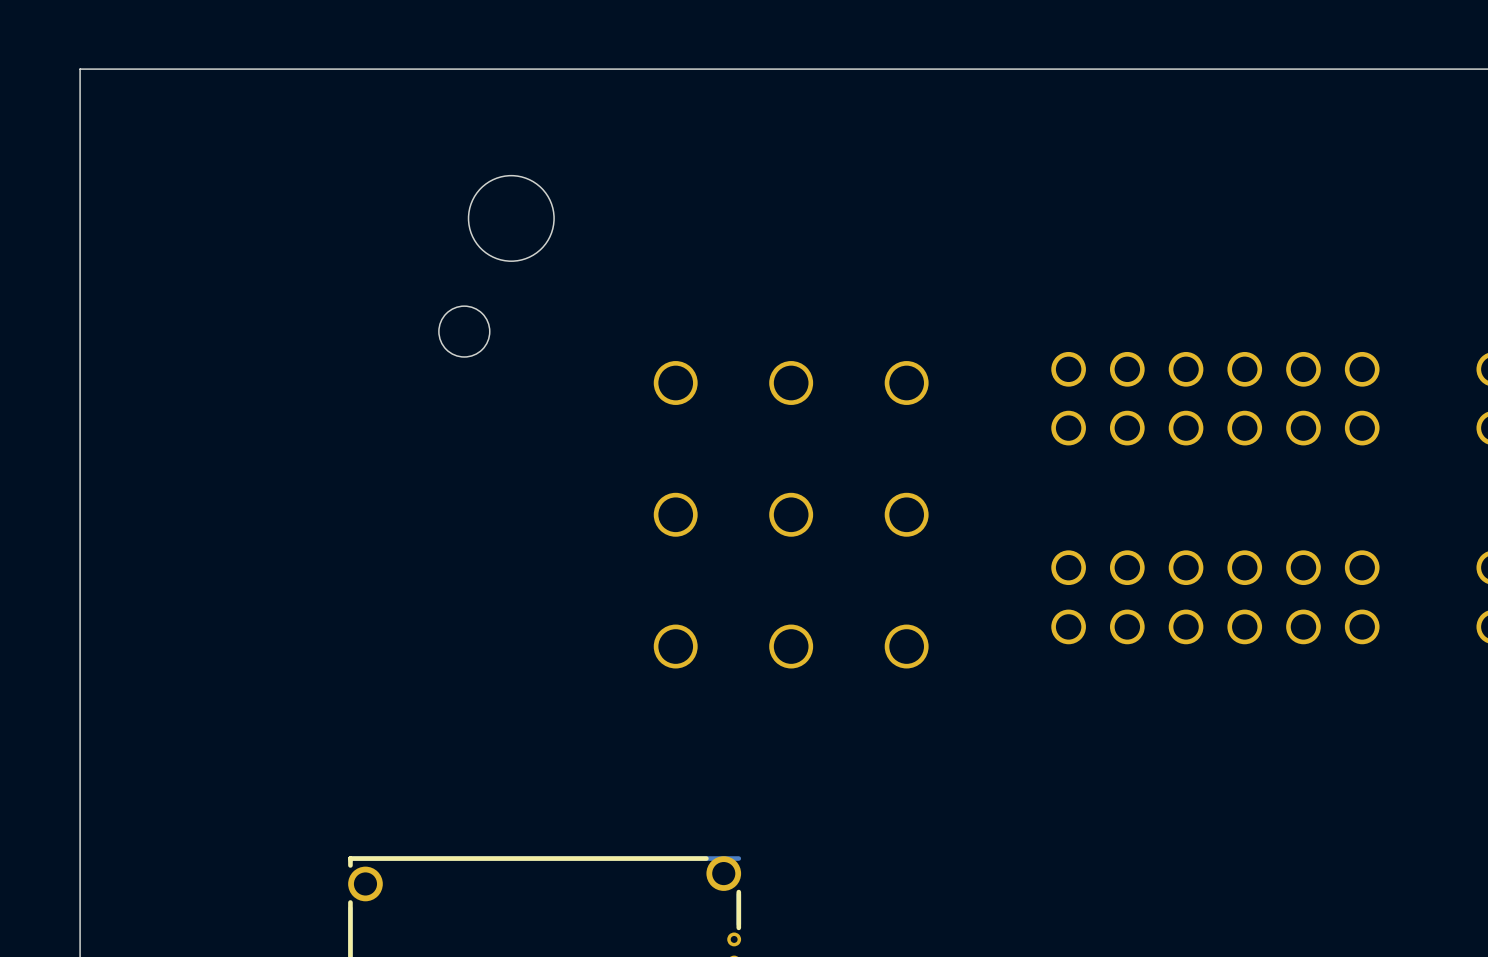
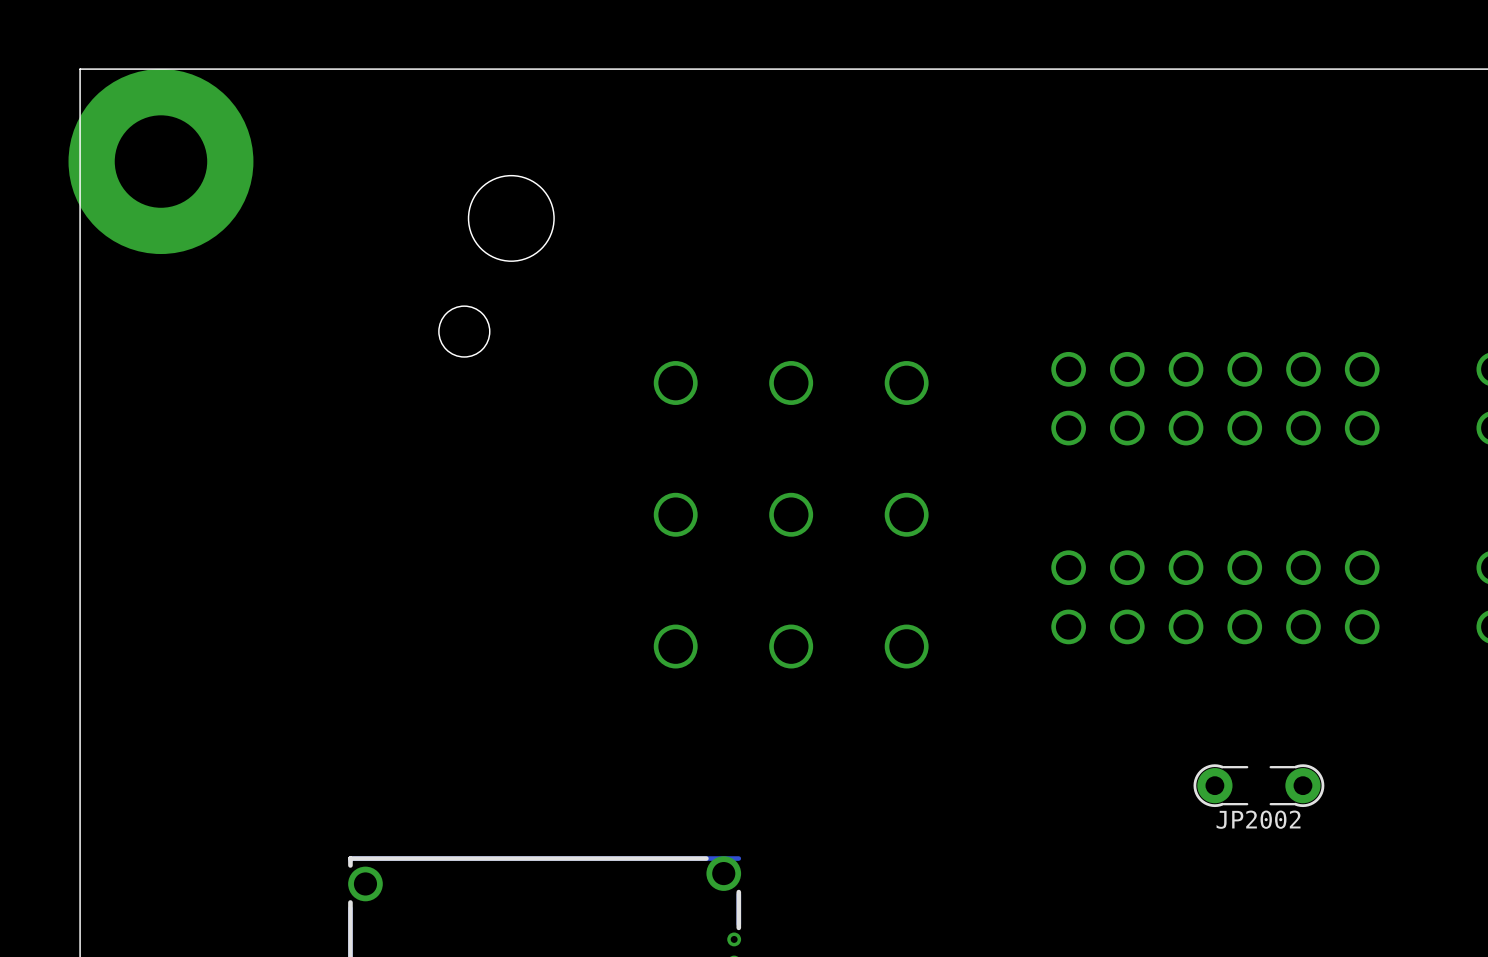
part: none -> (160, 161)
JP2002: none -> (1258, 785)

